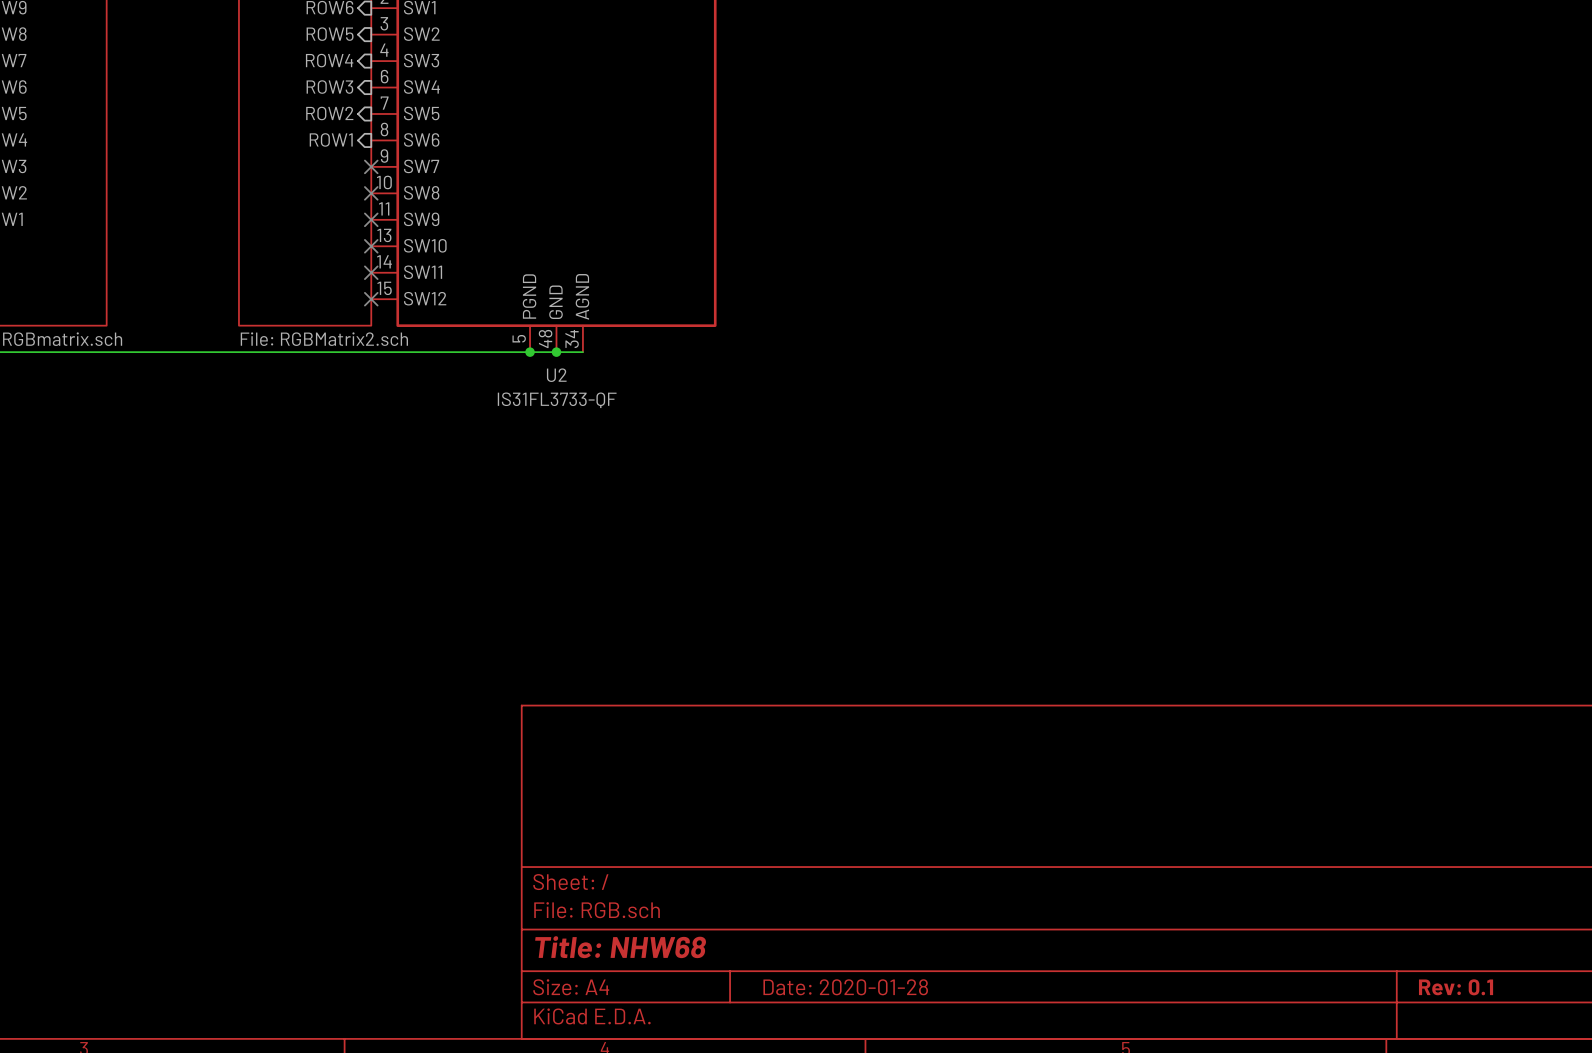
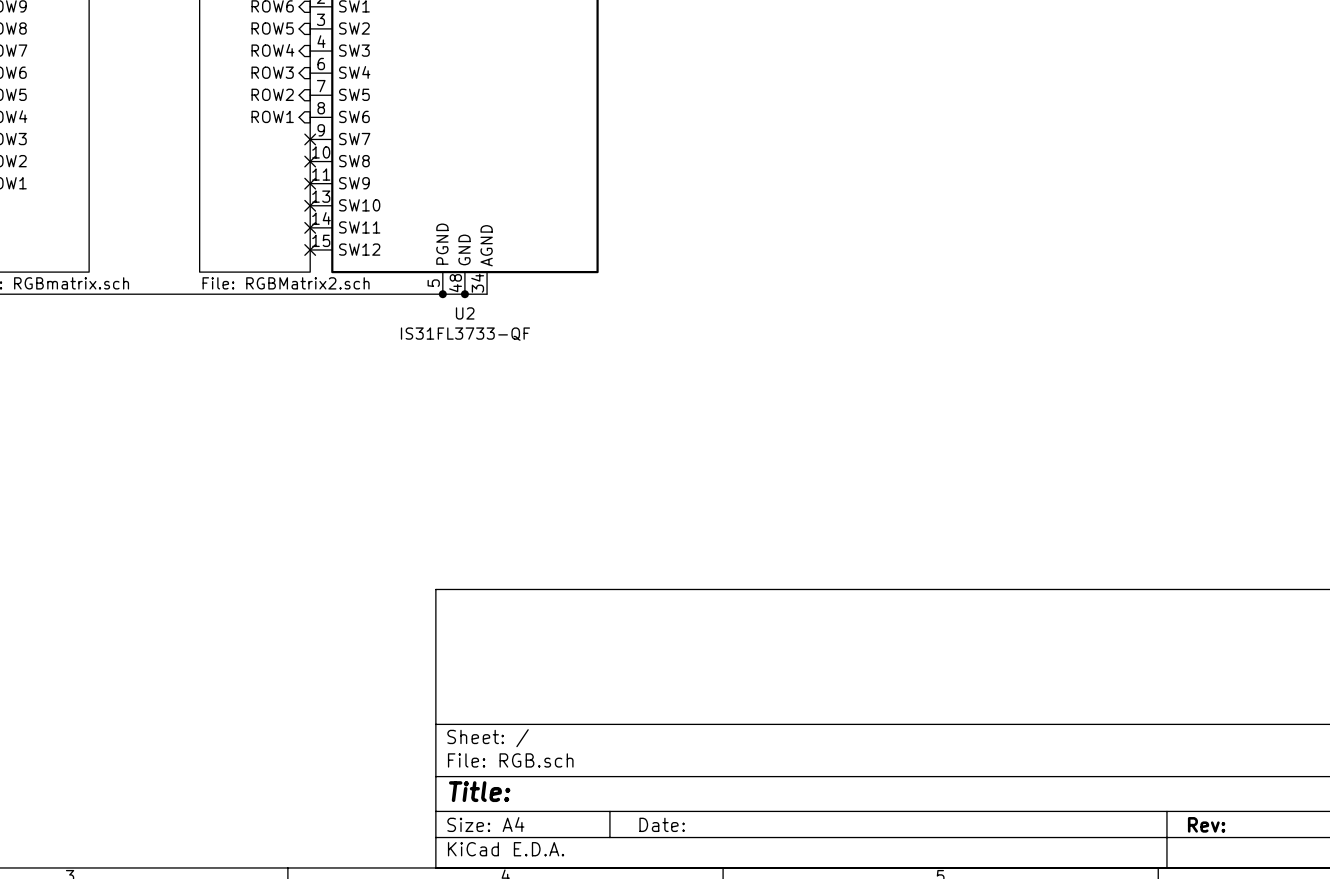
title block: Title: NHW68 (620, 947) -> Title: (479, 791)
title block: Date: 2020-01-28 (845, 987) -> Date: (662, 824)
title block: Rev: 0.1 (1456, 987) -> Rev: (1206, 824)

